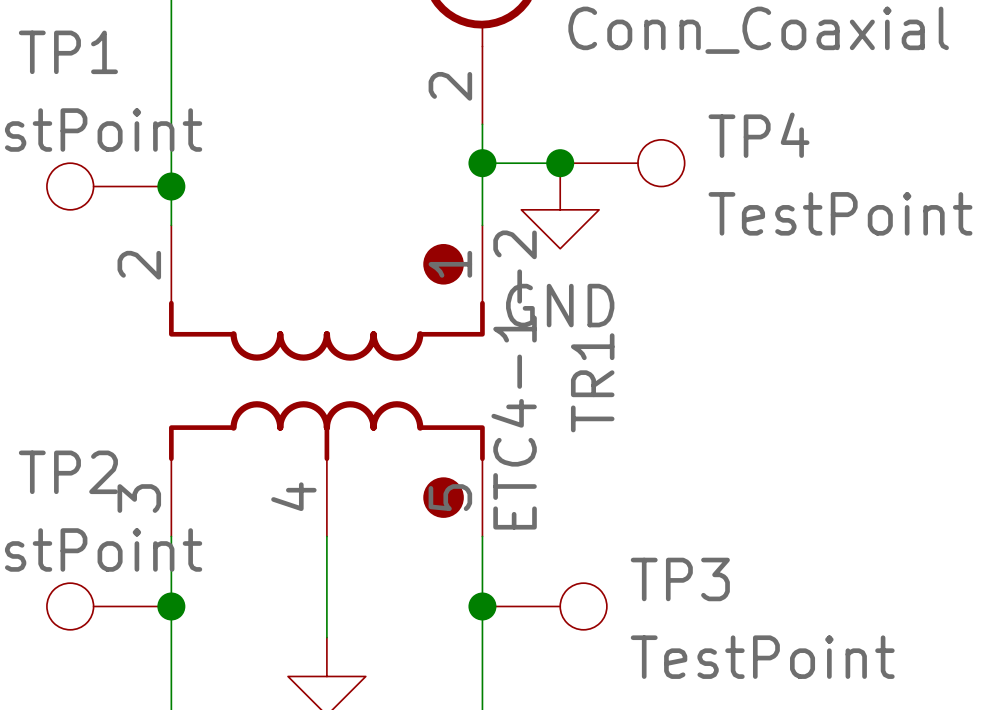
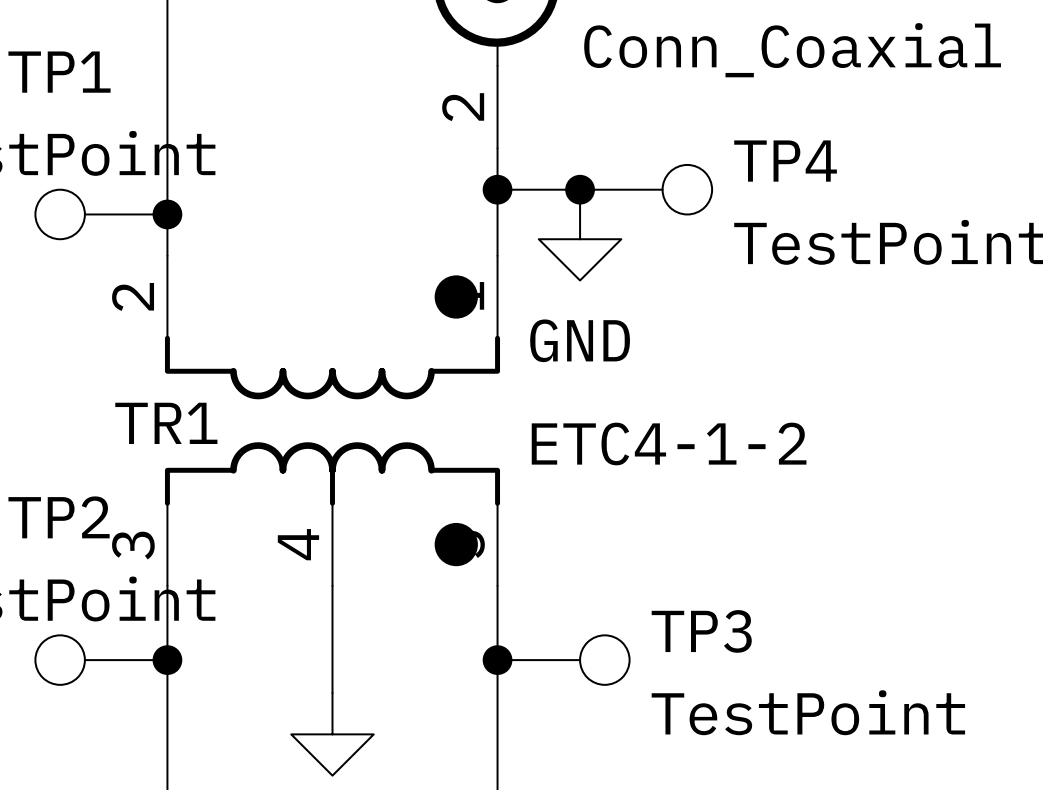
TR1 value rotation: 0° (514, 380) -> 90° clockwise (669, 443)
TR1 name rotation: 0° (592, 382) -> 90° clockwise (166, 423)
TR1 name position: TR1 (592, 382) -> TR1 (166, 423)

